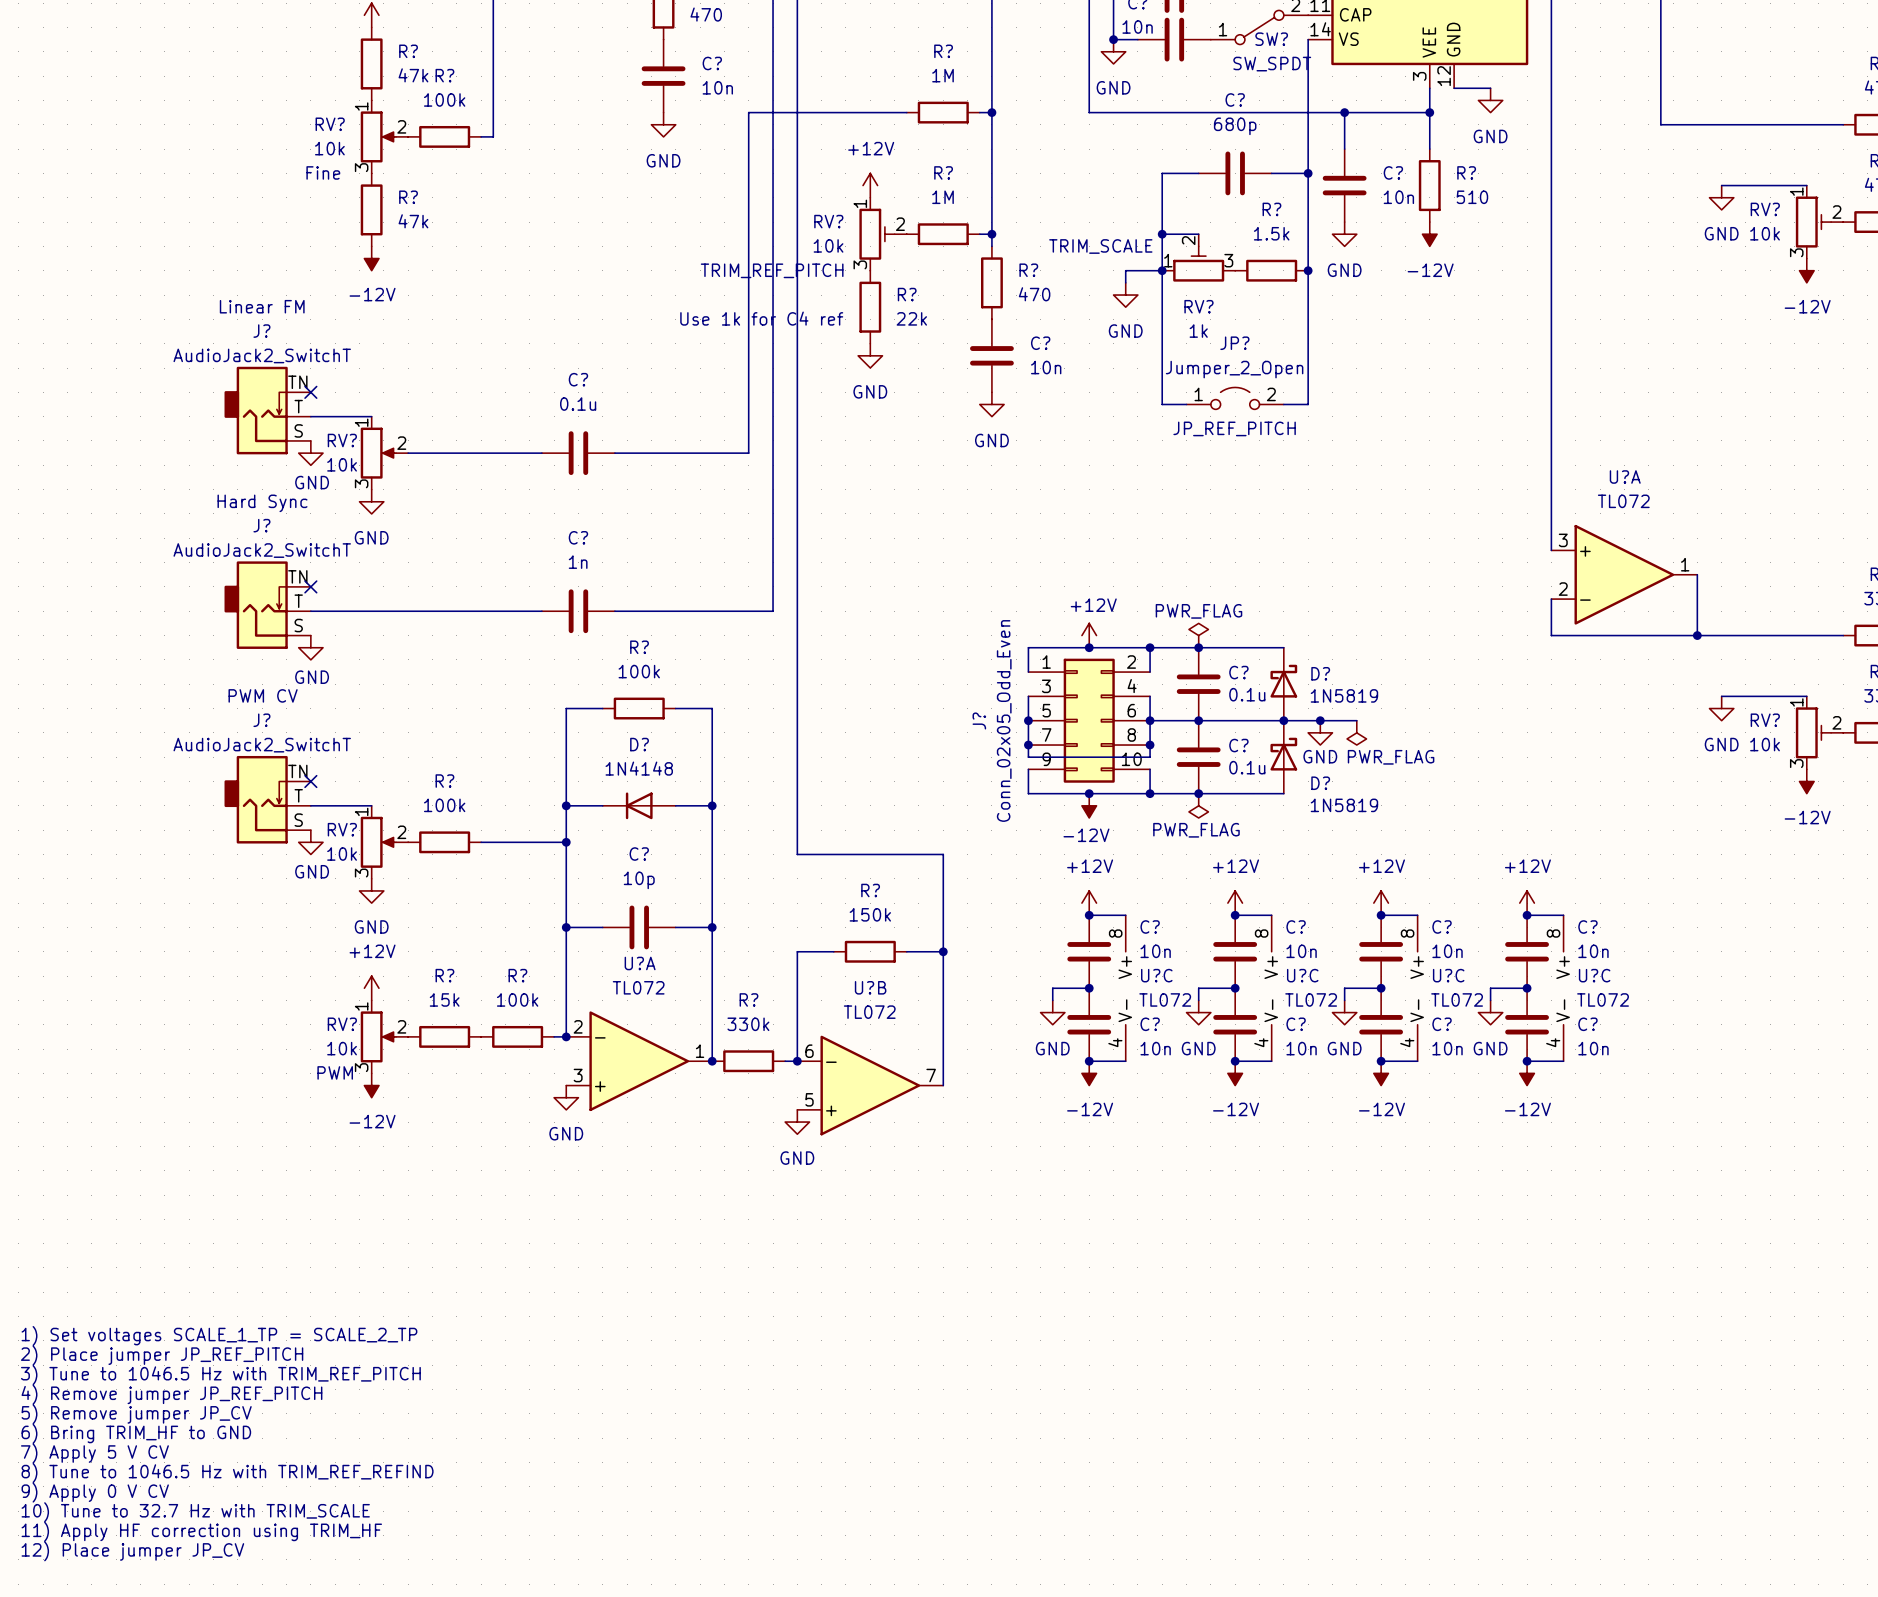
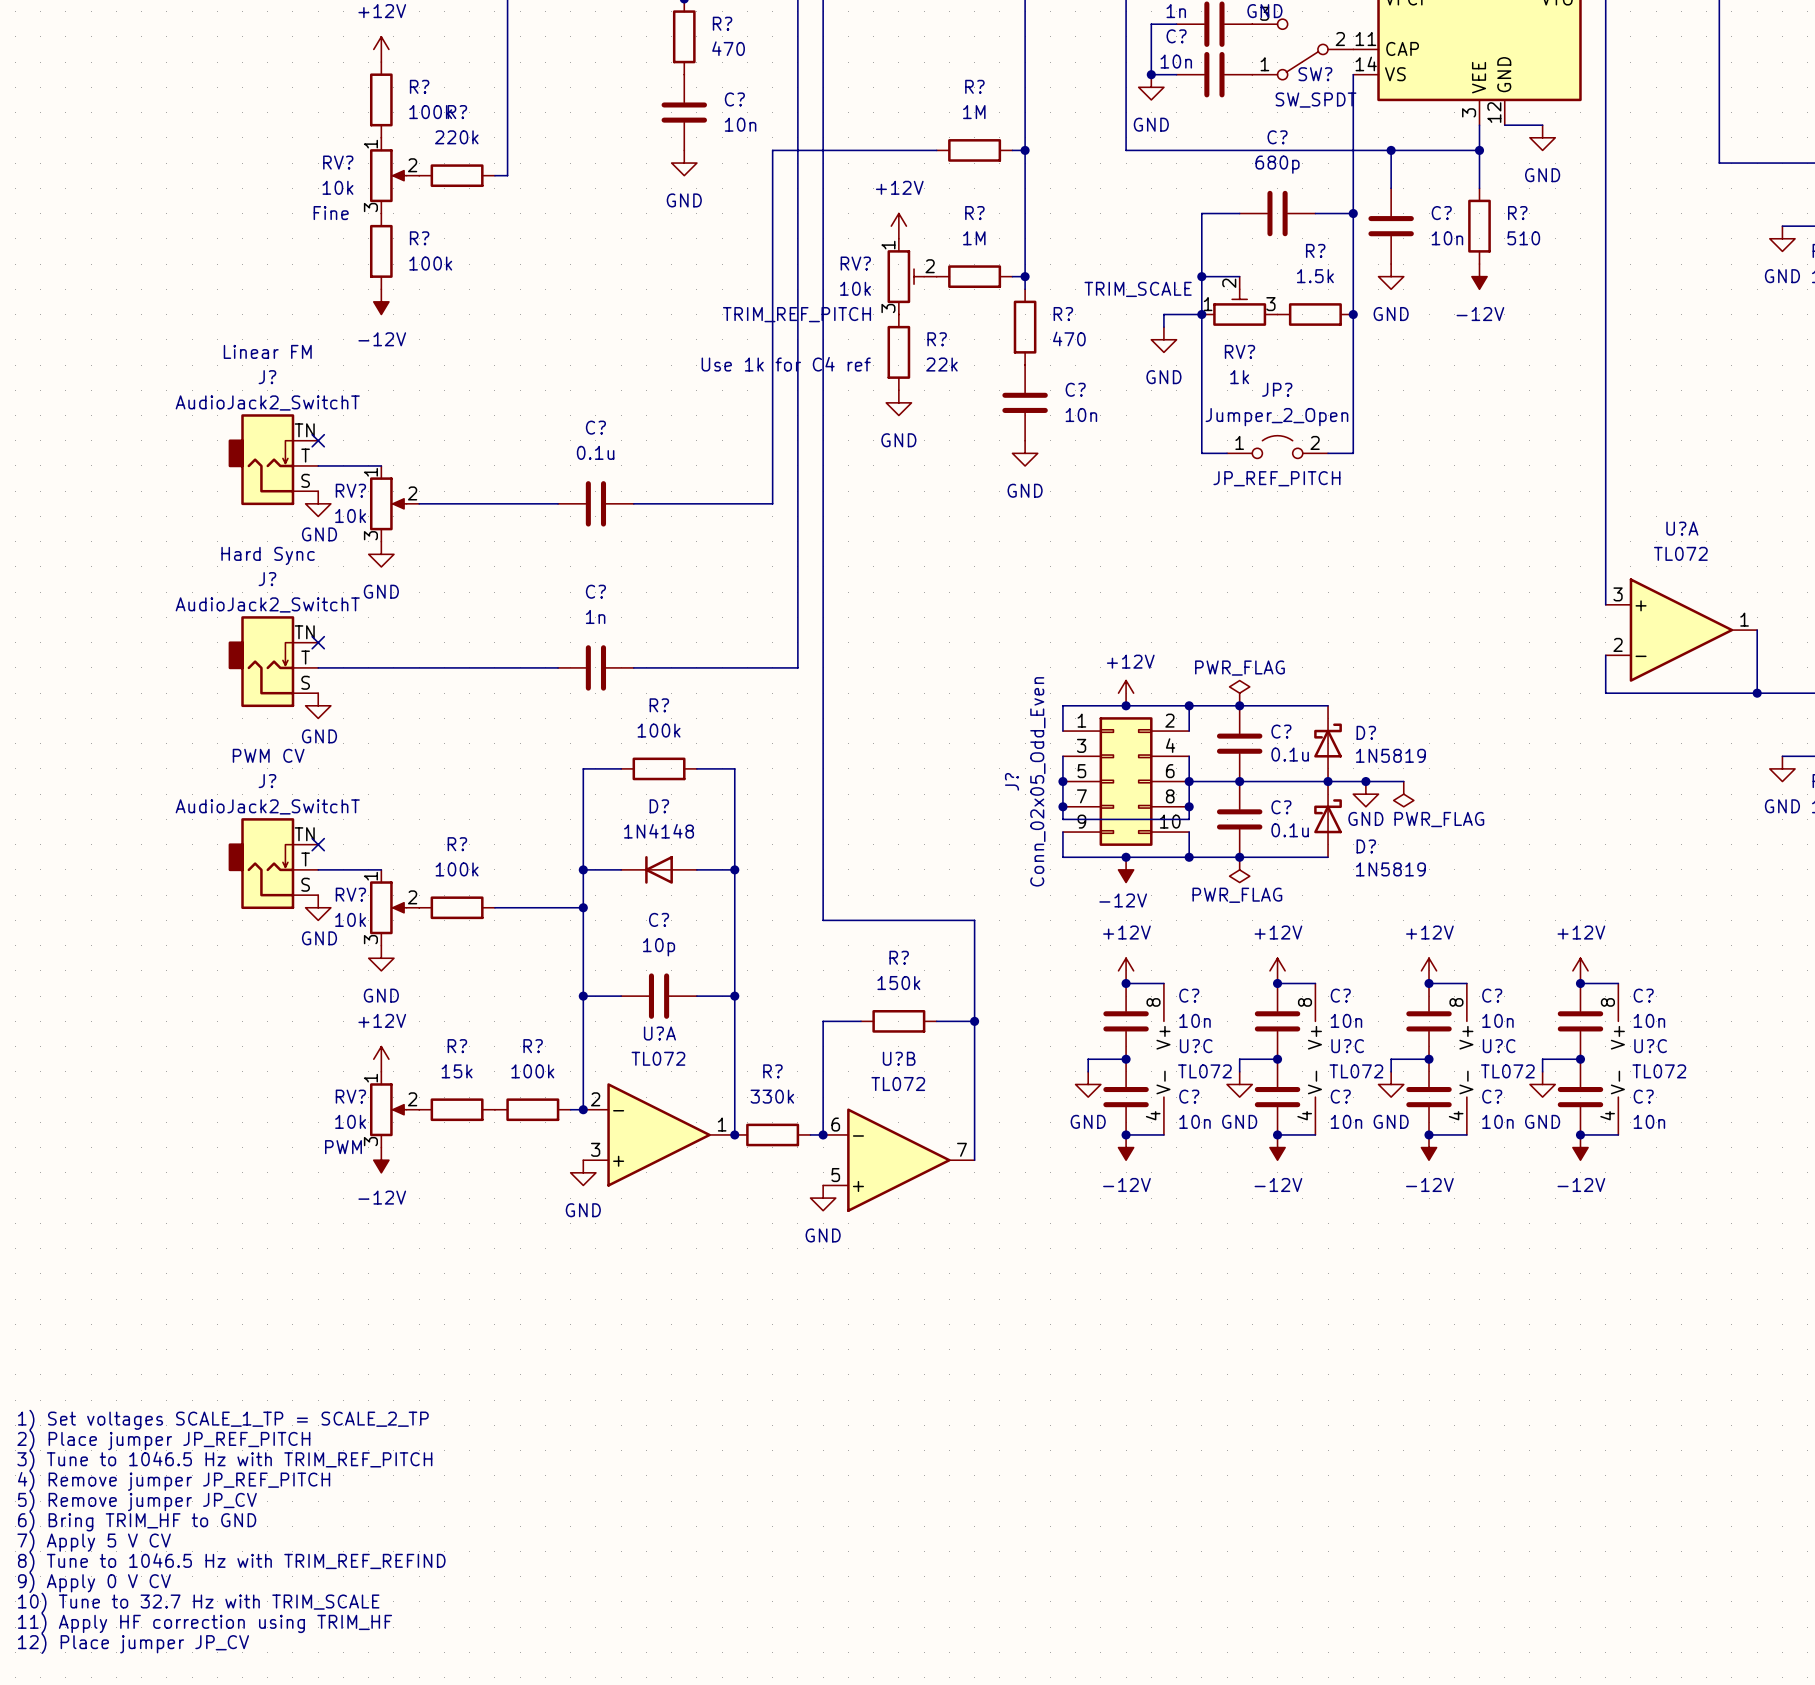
R? value: 47k (413, 75) -> 100k (430, 112)
R? value: 100k (444, 99) -> 220k (456, 137)
R? value: 47k (413, 221) -> 100k (430, 263)

